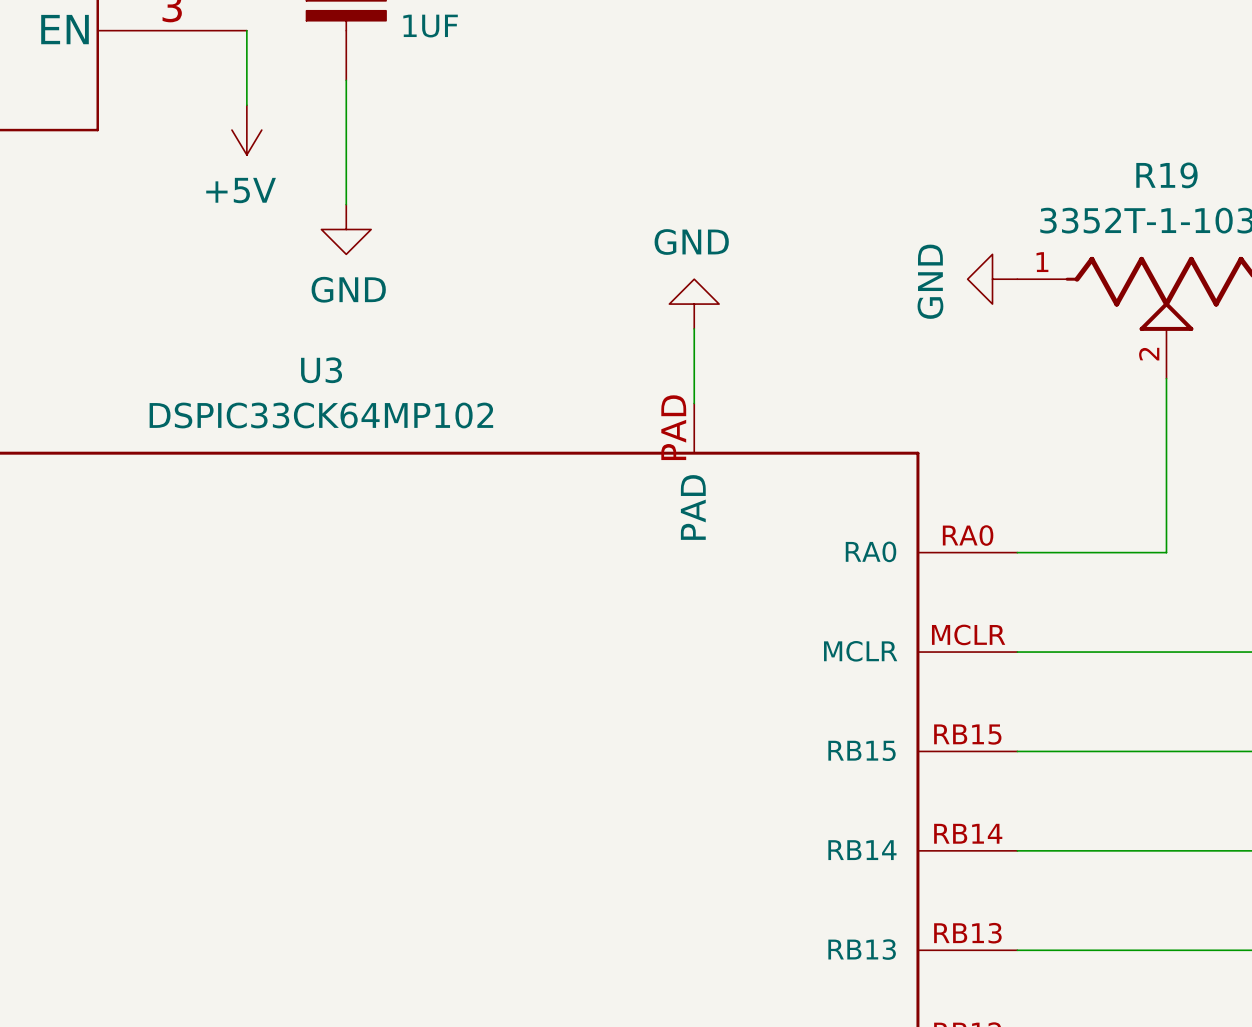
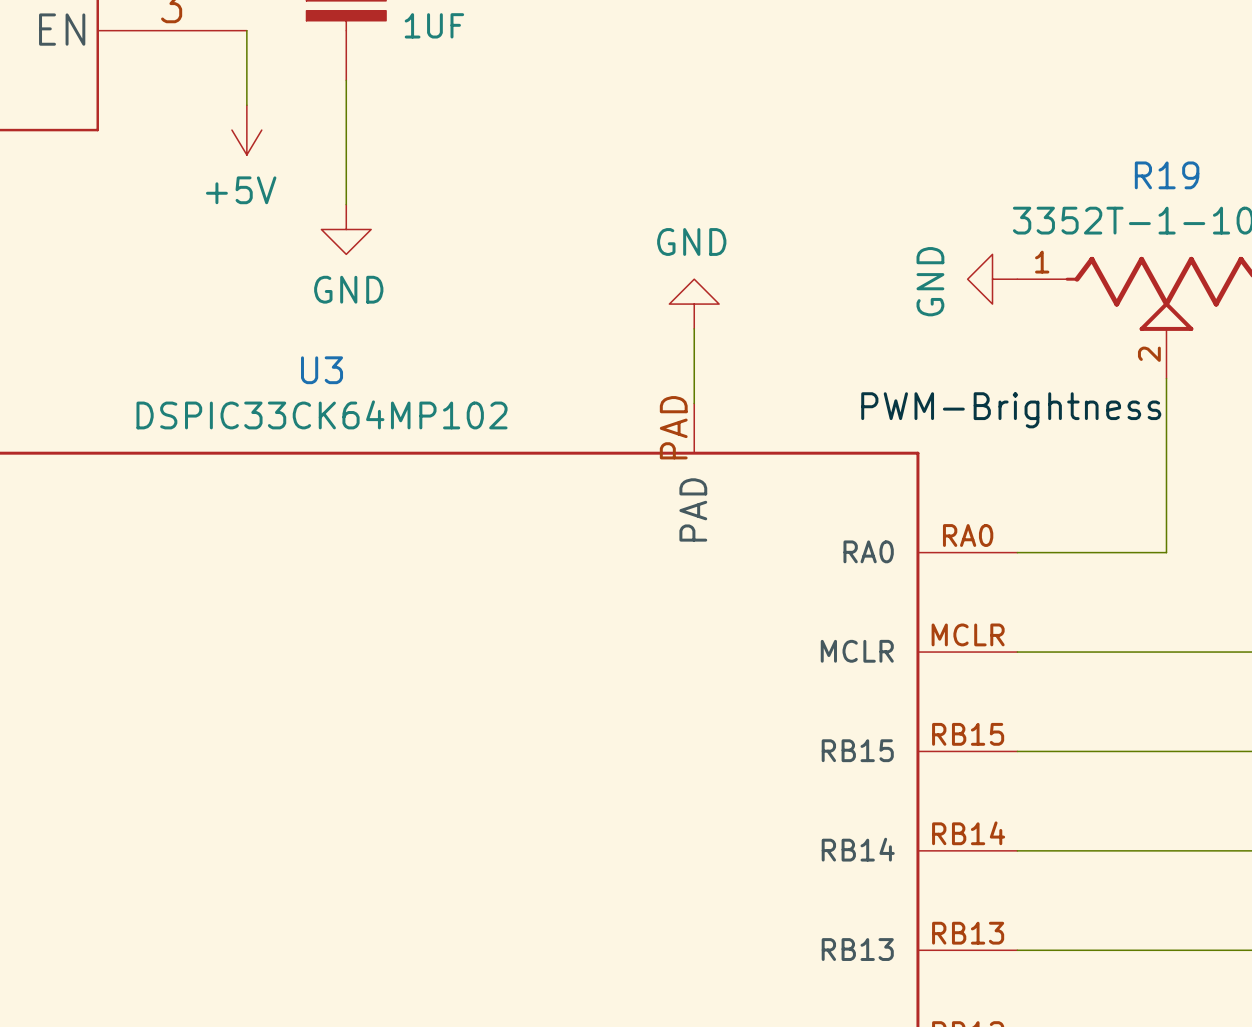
label: none -> PWM-Brightness (1011, 410)

